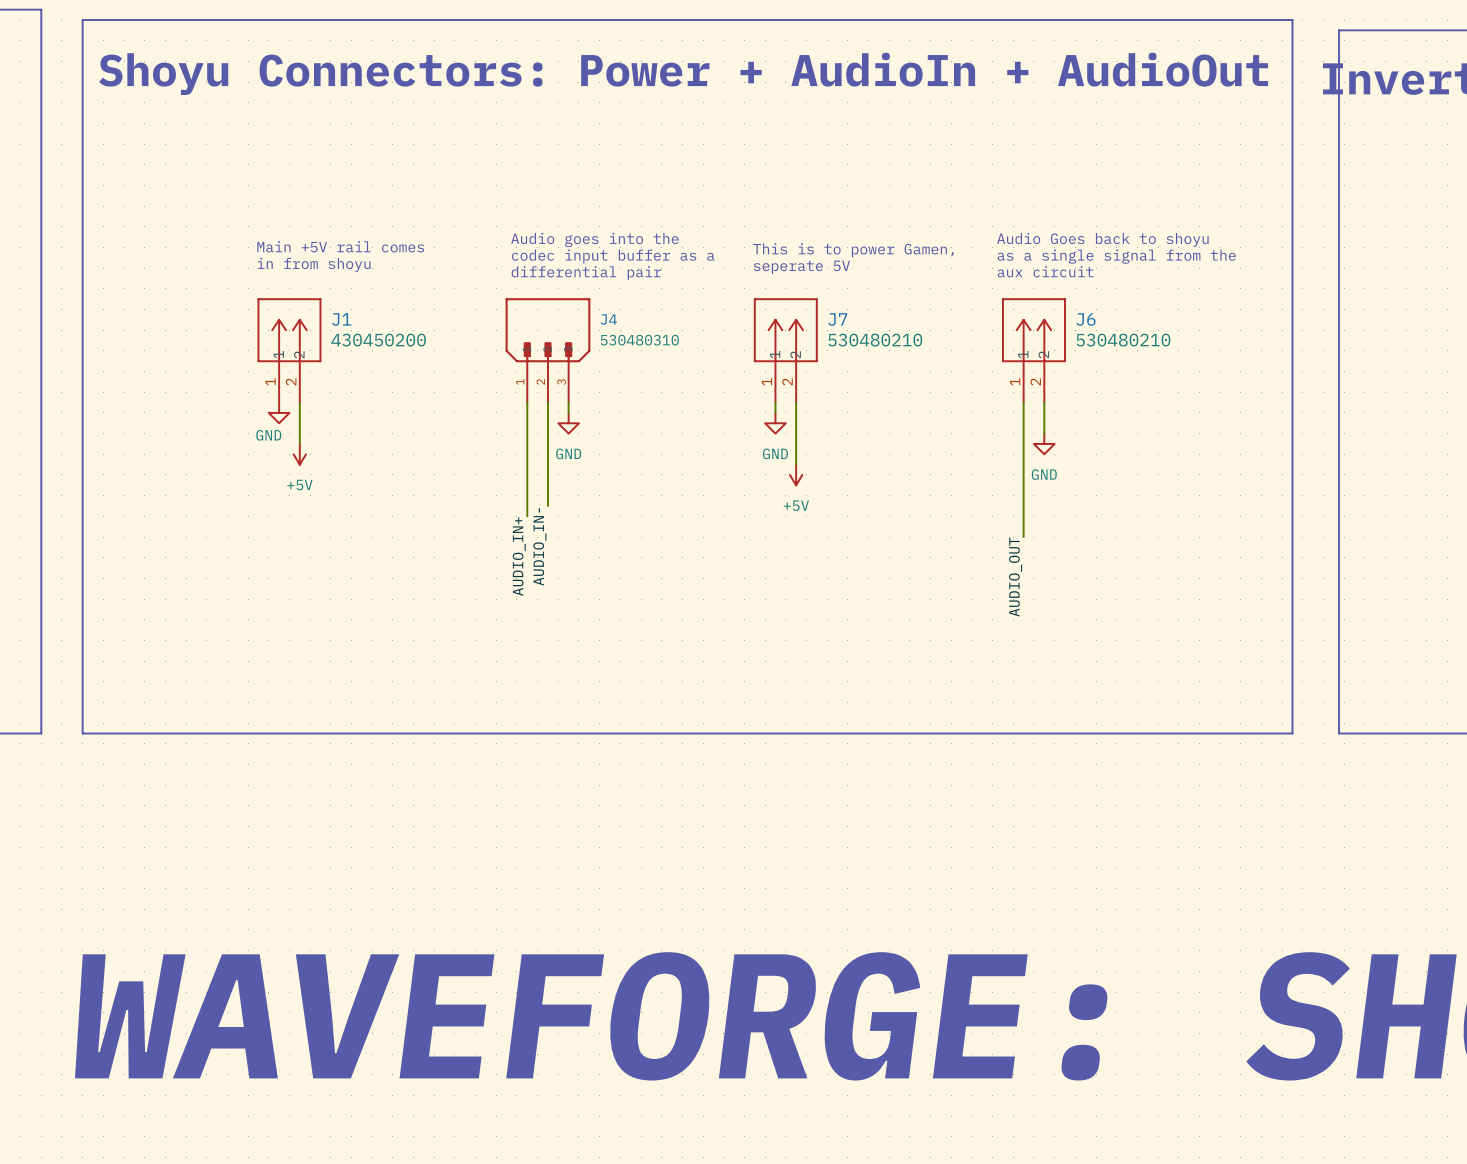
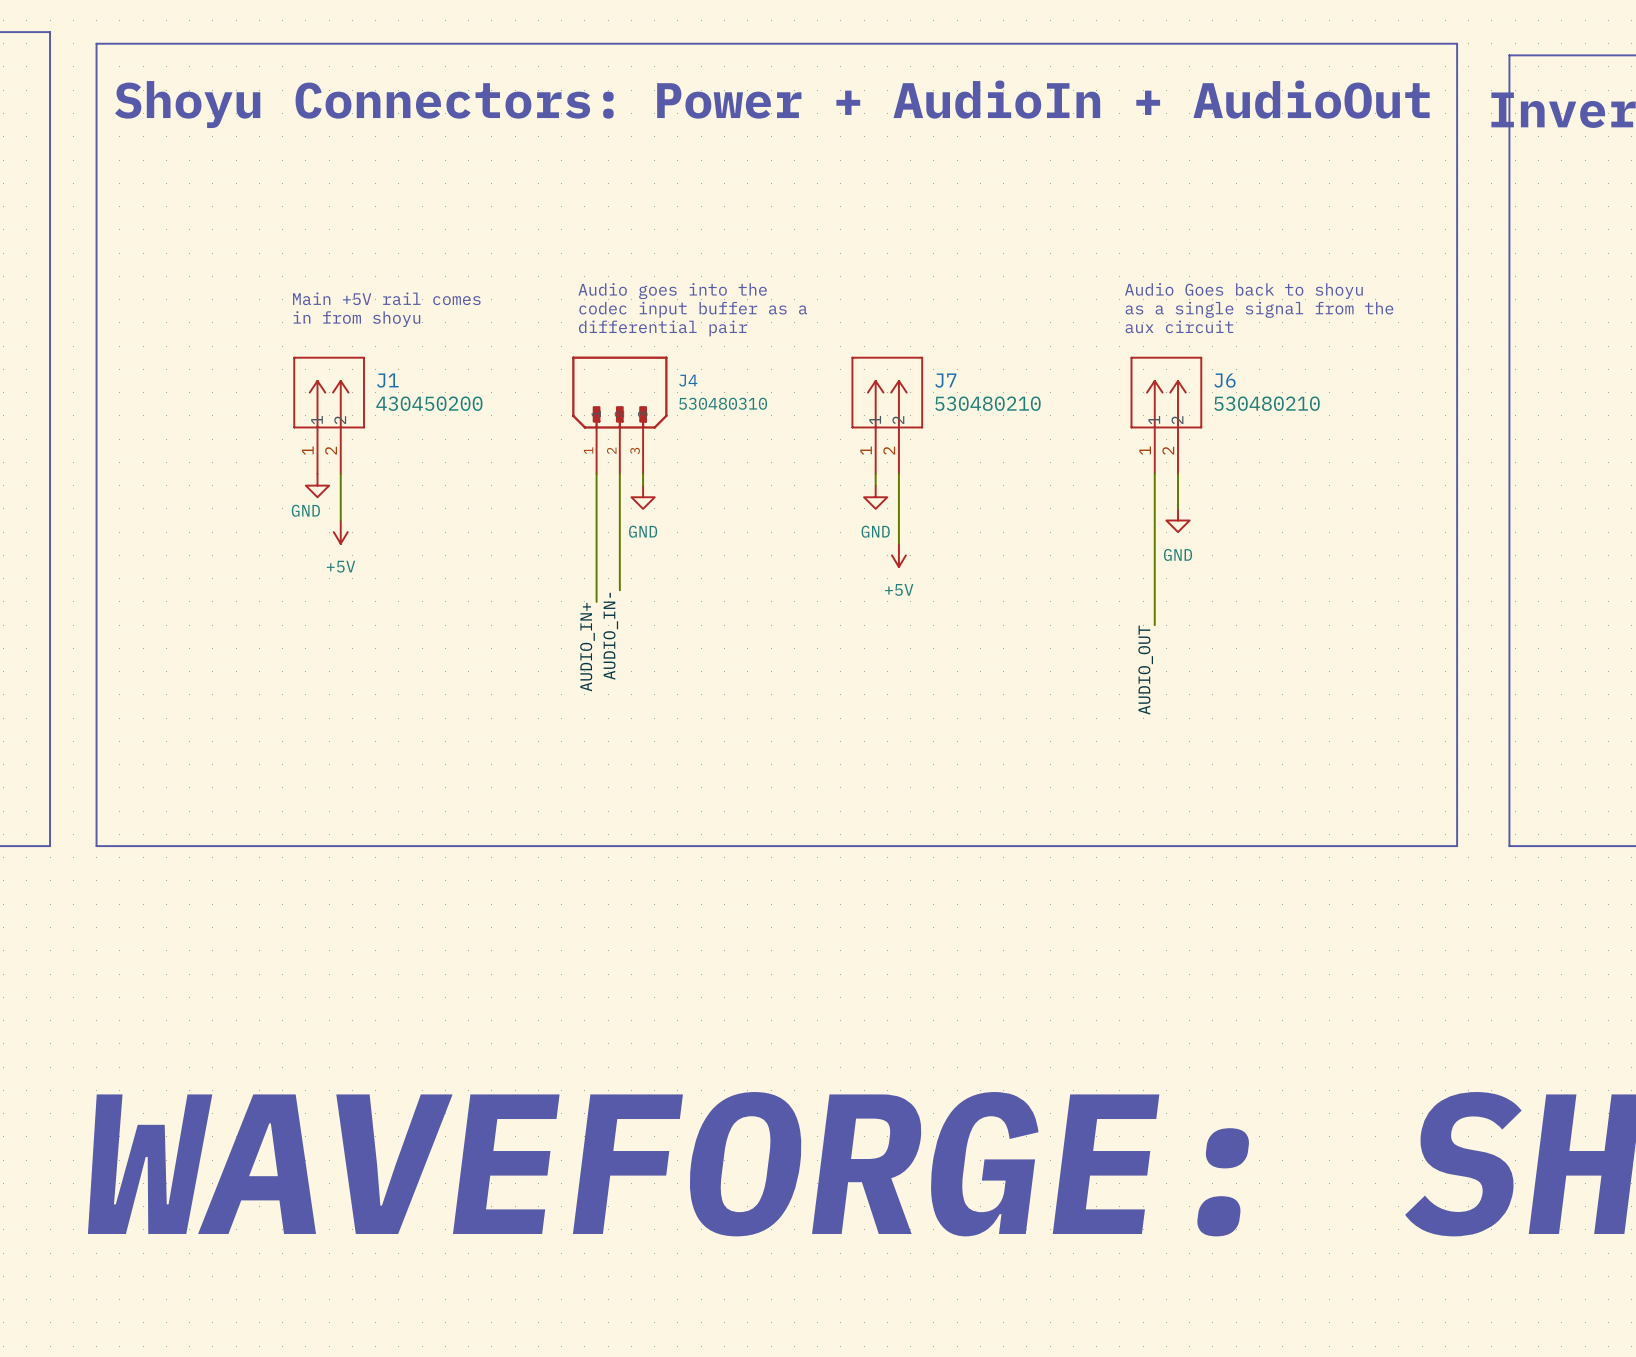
text: This is to power Gamen, (853, 250) -> none
text: seperate 5V (801, 267) -> none

